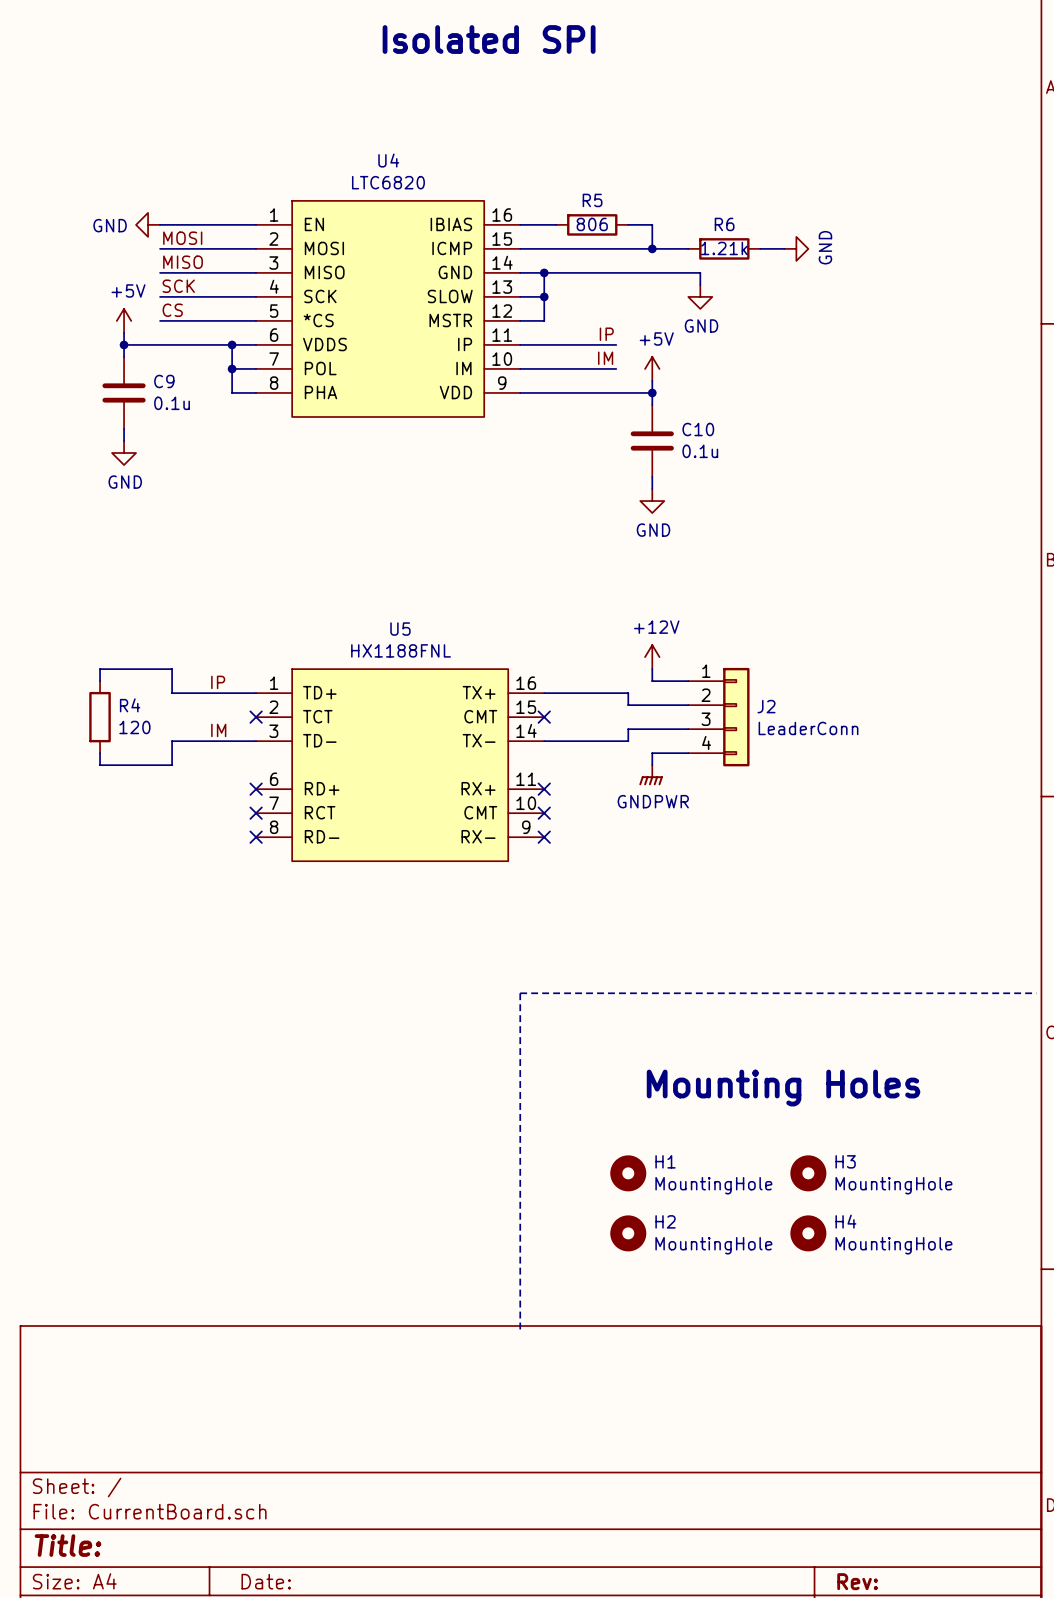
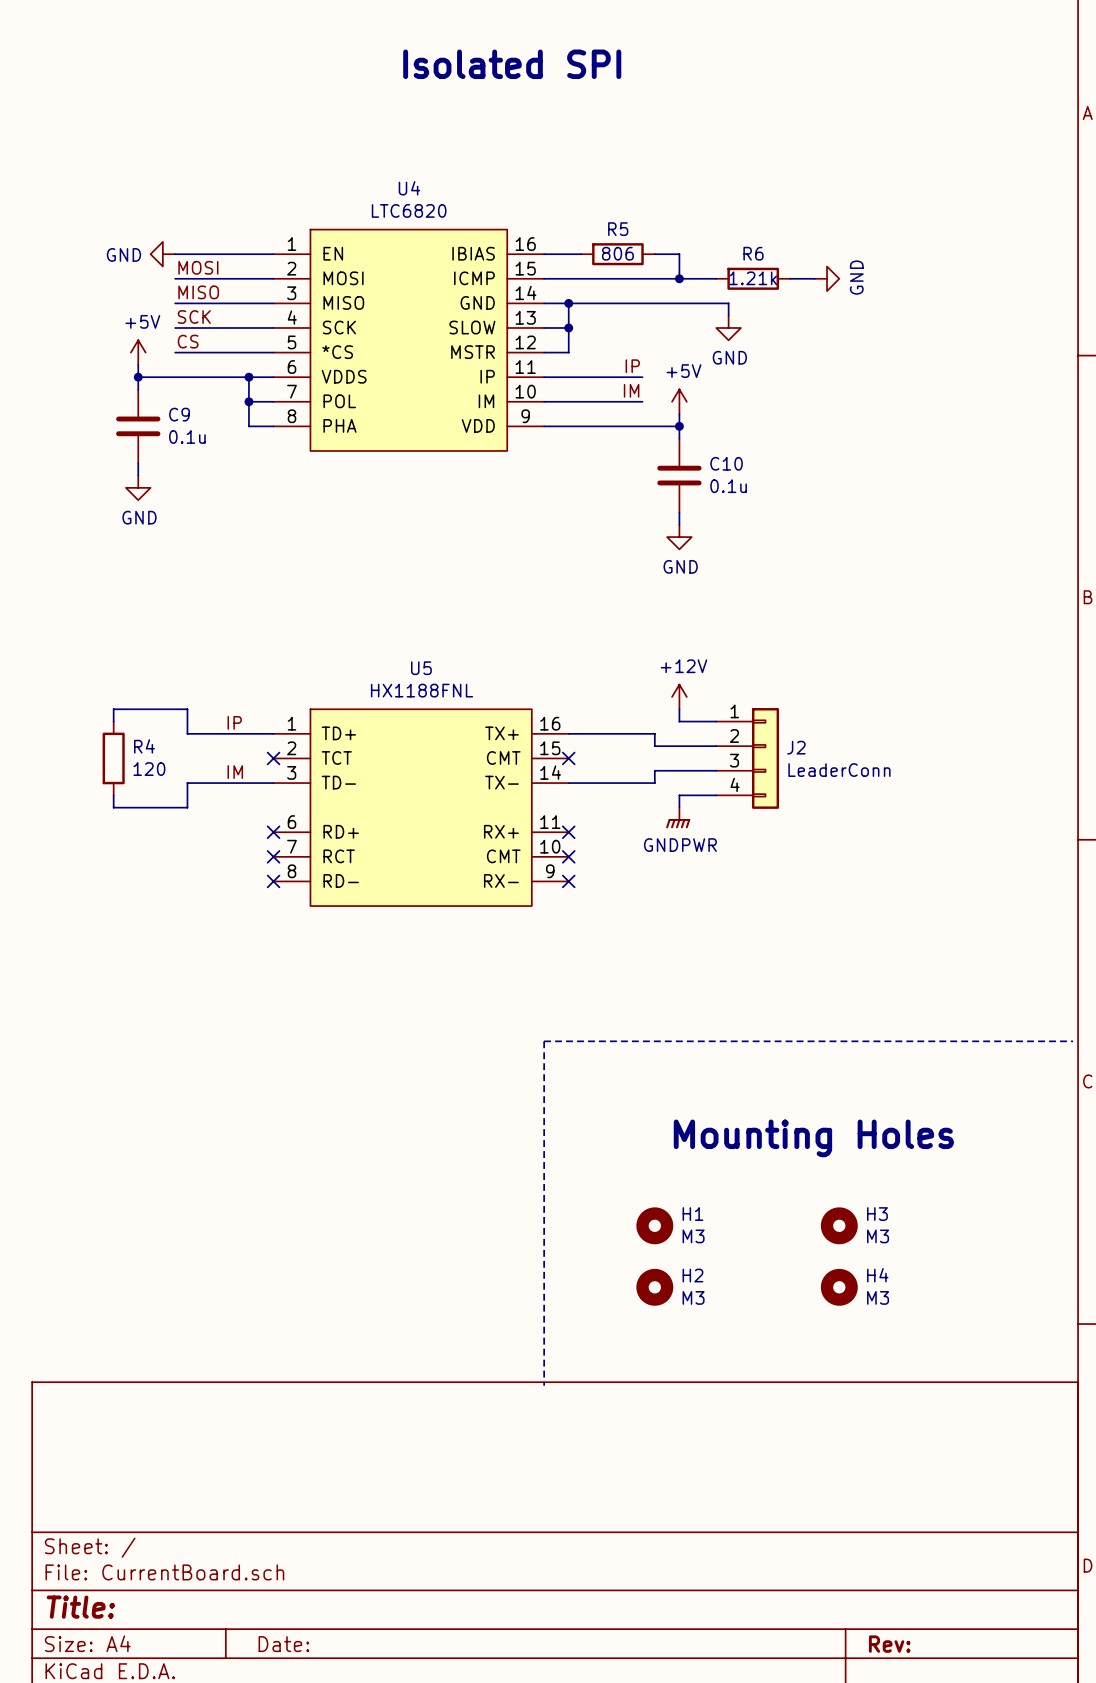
H1 value: MountingHole (713, 1185) -> M3 (693, 1236)
H3 value: MountingHole (893, 1185) -> M3 (878, 1236)
H2 value: MountingHole (713, 1245) -> M3 (693, 1297)
H4 value: MountingHole (893, 1245) -> M3 (878, 1297)

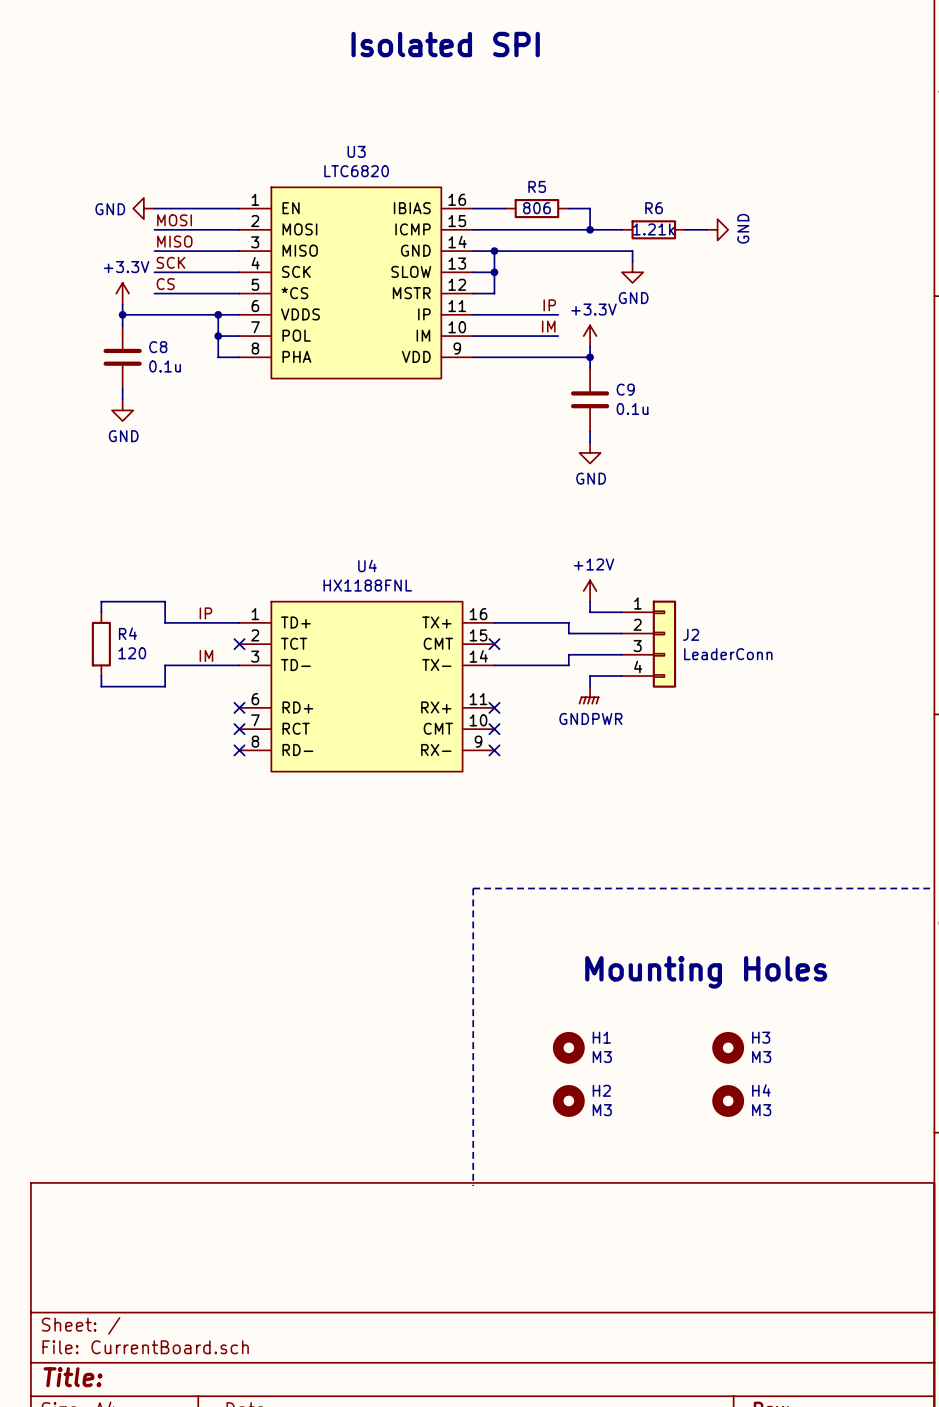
U4 name: U4 (409, 188) -> U3 (356, 151)
power symbol: +5V (138, 352) -> +3.3V (122, 293)
power symbol: +5V (679, 401) -> +3.3V (590, 336)
C9 name: C9 (179, 414) -> C8 (158, 347)
C10 name: C10 (726, 463) -> C9 (625, 389)
U5 name: U5 (421, 668) -> U4 (367, 565)

